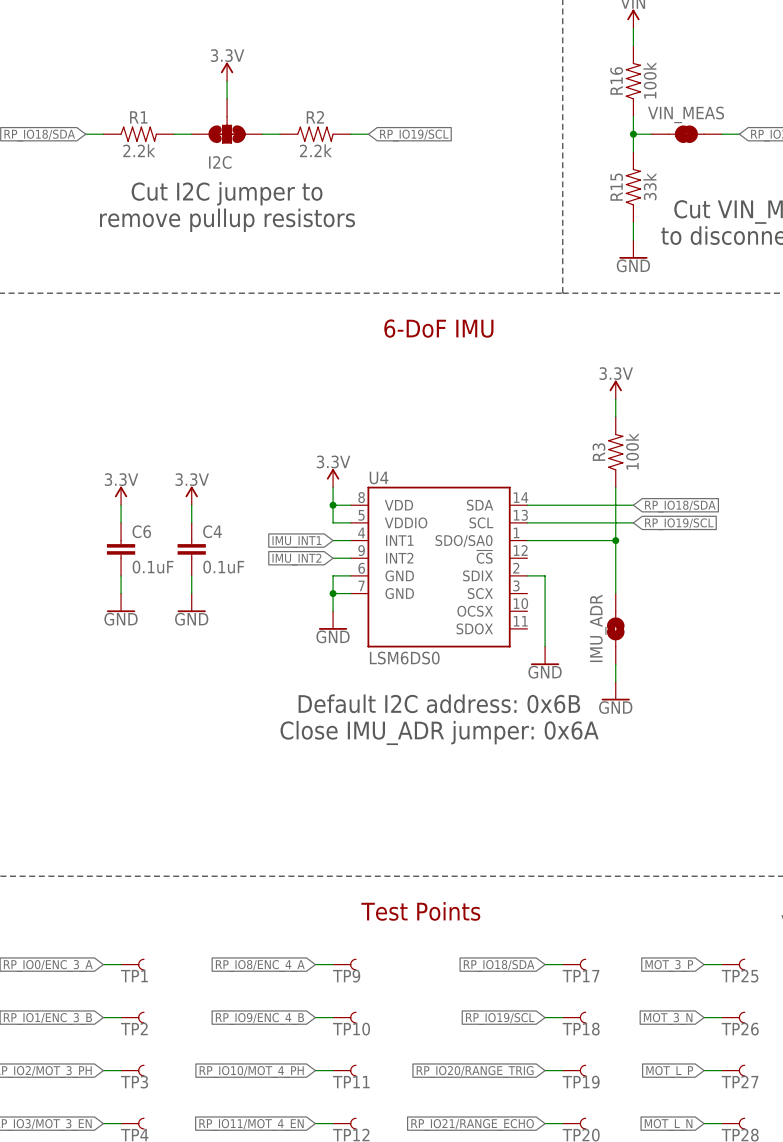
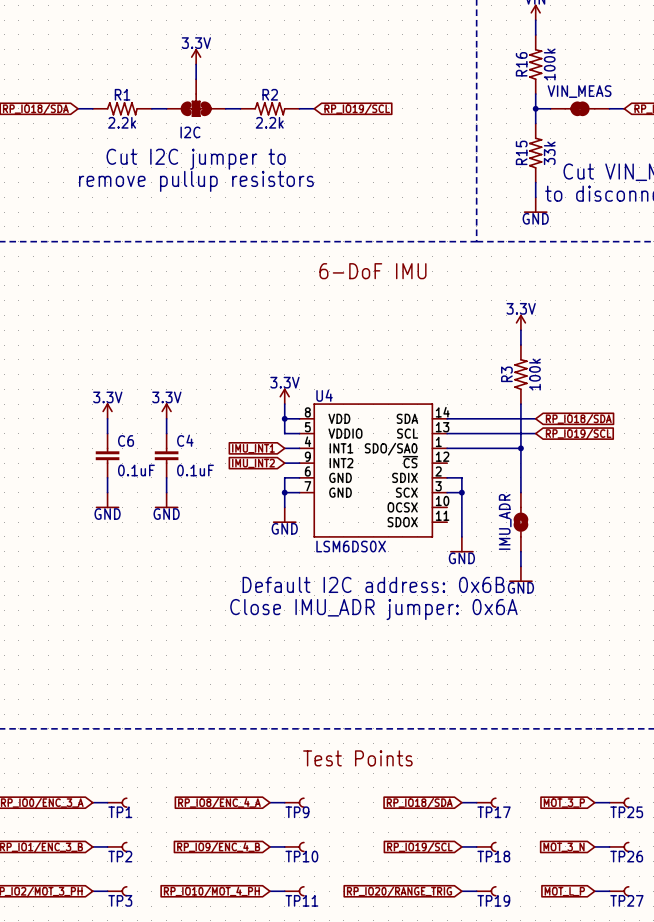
wire: none -> (447, 492) (461, 492)
junction: none -> (461, 492)
U4 value: LSM6DS0 (404, 658) -> LSM6DS0X (351, 546)

